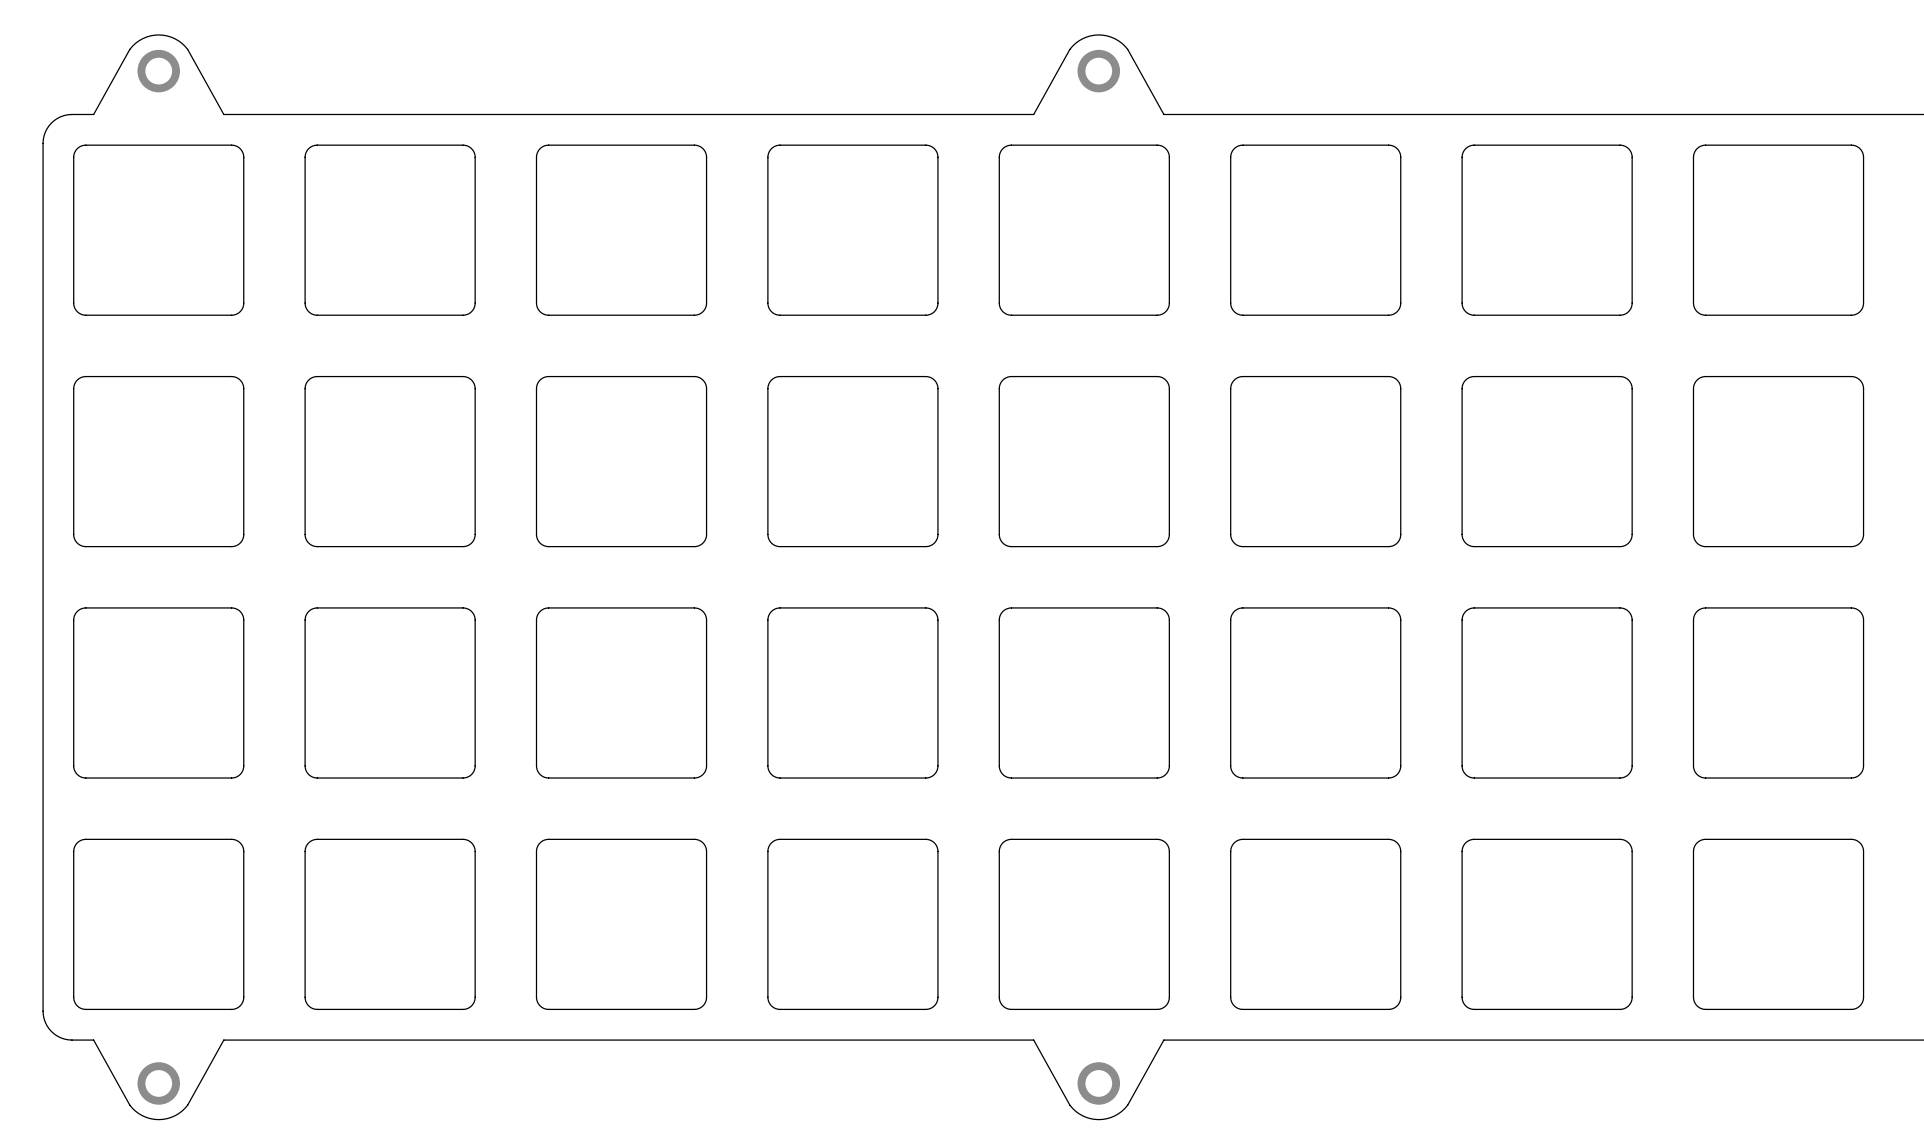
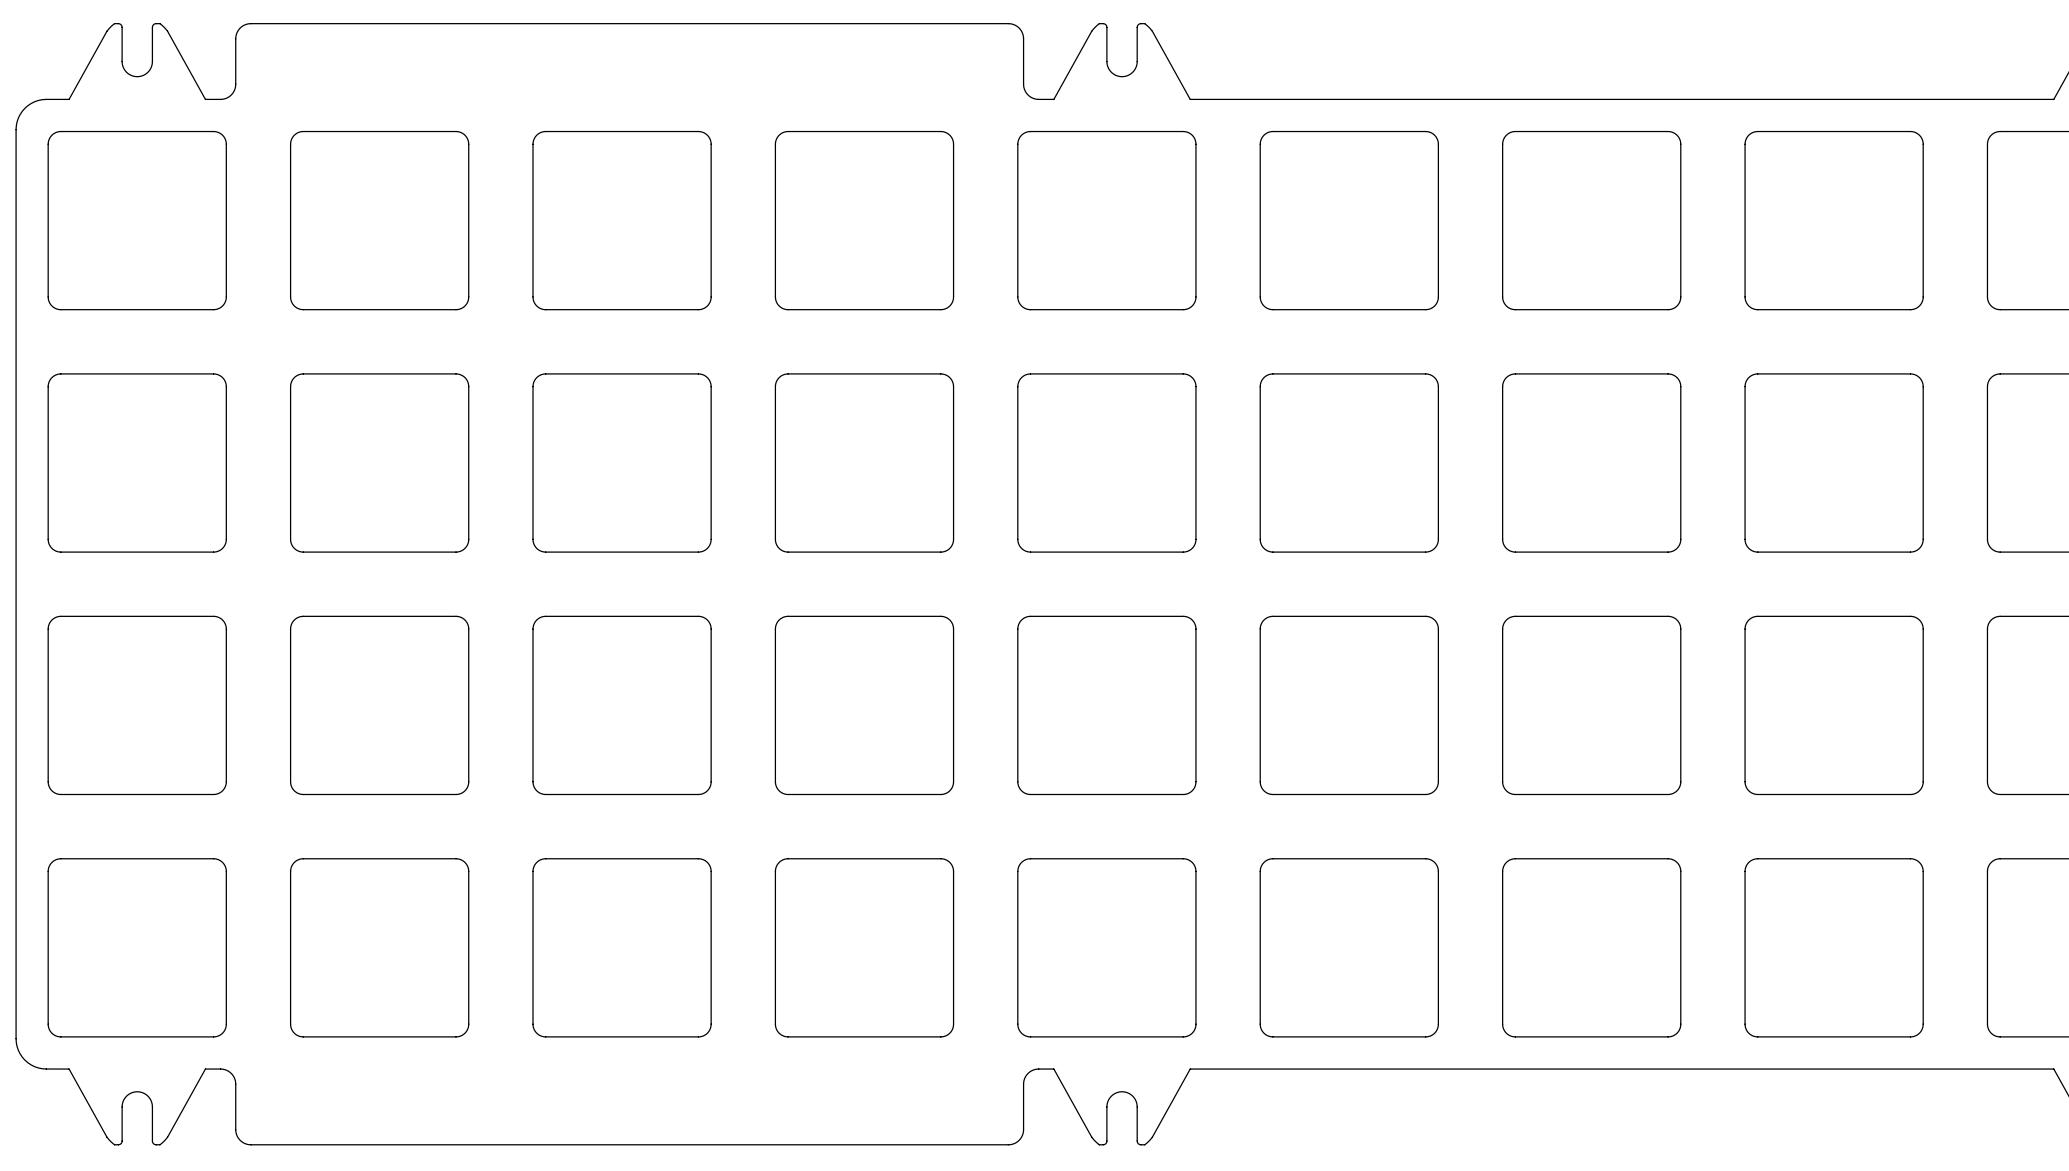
board edge: (129, 49) (142, 38) (158, 34) (174, 38) (187, 49) -> (106, 31) (114, 23) (121, 25) (122, 65) (128, 73) (137, 76) (146, 73) (151, 65) (152, 25) (159, 23) (167, 31)
board edge: (1069, 49) (1082, 38) (1098, 34) (1114, 38) (1127, 49) -> (1091, 31) (1099, 23) (1106, 25) (1107, 65) (1113, 73) (1122, 76) (1130, 73) (1136, 65) (1137, 25) (1144, 23) (1152, 31)
part: (158, 71) -> none
part: (1098, 71) -> none
board edge: (238, 114) (1019, 114) -> (220, 99) (230, 96) (235, 87) (236, 33) (241, 26) (250, 23) (1010, 23) (1017, 26) (1023, 35) (1024, 89) (1029, 96) (1038, 99)
board edge: (238, 1040) (1033, 1040) -> (220, 1069) (230, 1072) (235, 1080) (236, 1134) (241, 1141) (250, 1144) (1010, 1144) (1017, 1141) (1023, 1133) (1023, 1084) (1025, 1076) (1035, 1069) (1053, 1069)
part: (158, 1083) -> none
part: (1098, 1083) -> none
board edge: (129, 1105) (142, 1115) (158, 1119) (174, 1115) (187, 1105) -> (106, 1137) (114, 1144) (121, 1143) (122, 1103) (128, 1094) (137, 1091) (145, 1094) (151, 1103) (153, 1143) (159, 1144) (167, 1137)
board edge: (1069, 1105) (1082, 1115) (1098, 1119) (1114, 1115) (1127, 1105) -> (1091, 1137) (1099, 1144) (1106, 1143) (1107, 1102) (1112, 1094) (1122, 1091) (1131, 1094) (1136, 1102) (1137, 1143) (1144, 1144) (1152, 1137)

